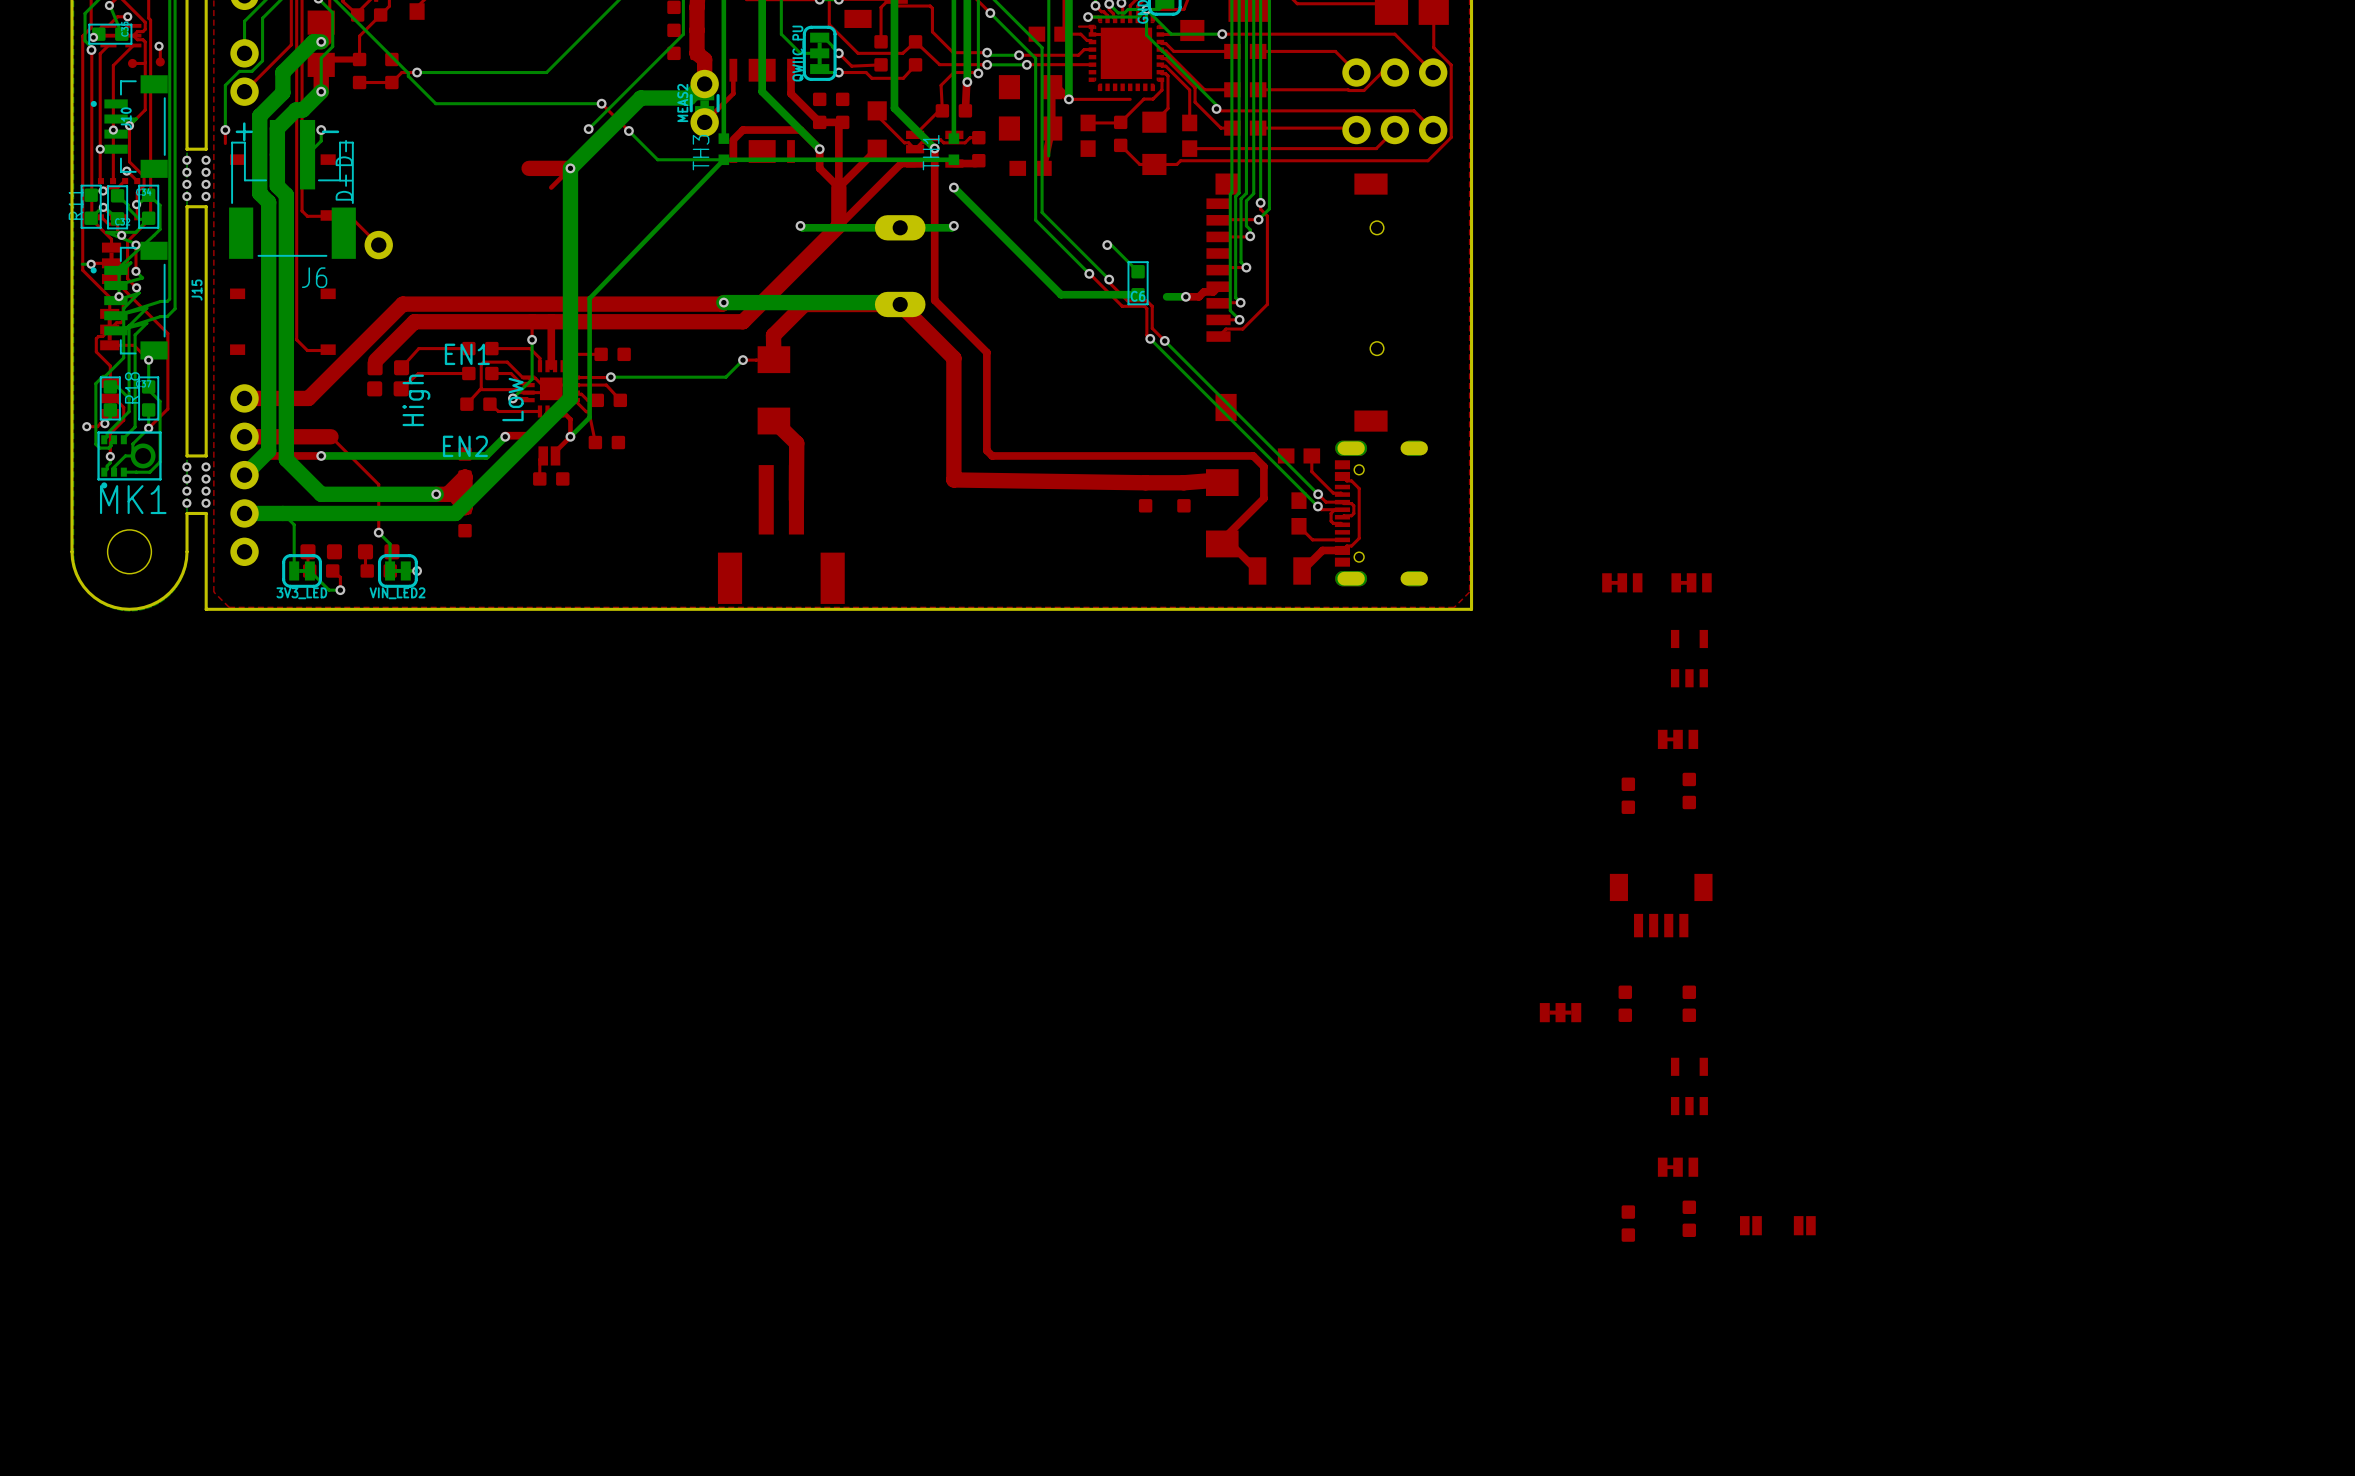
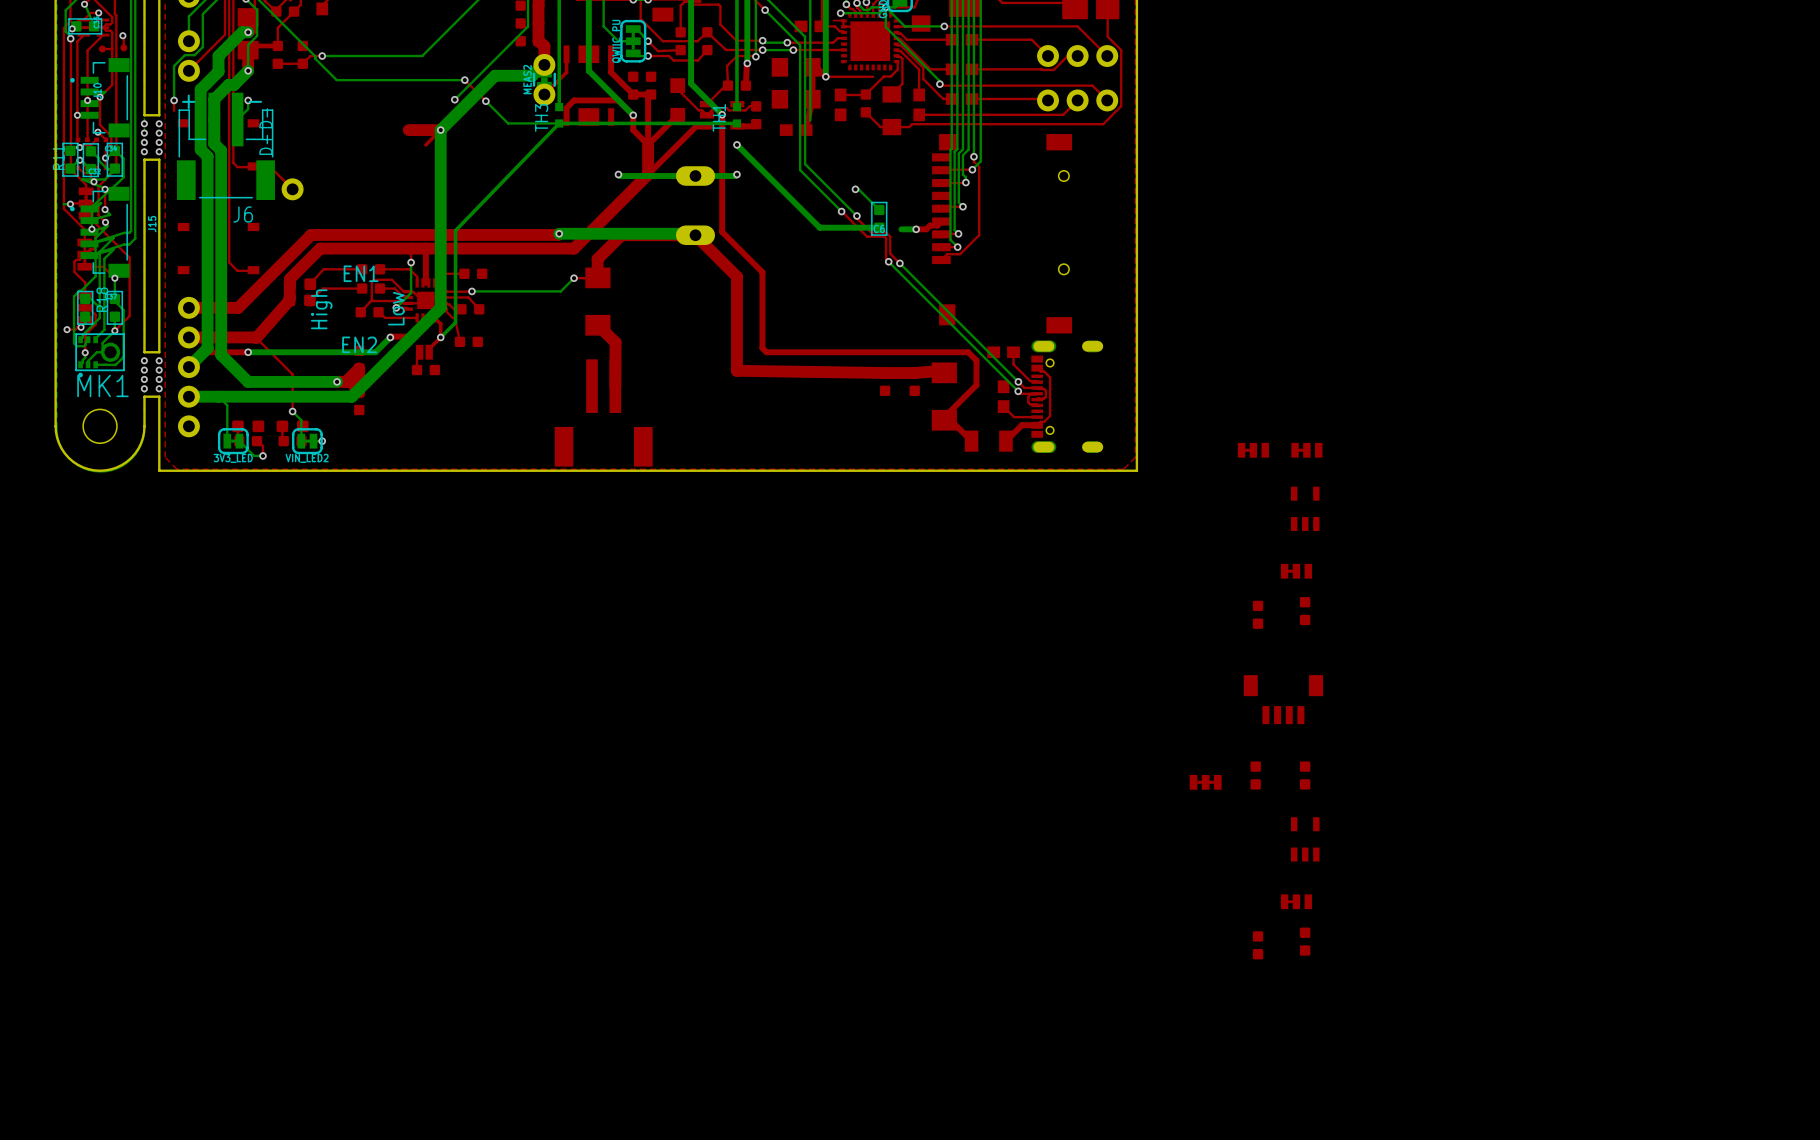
top track: none -> (290, 278) (289, 300) (256, 338)
part: (1750, 1225) -> none
part: (1804, 1225) -> none

